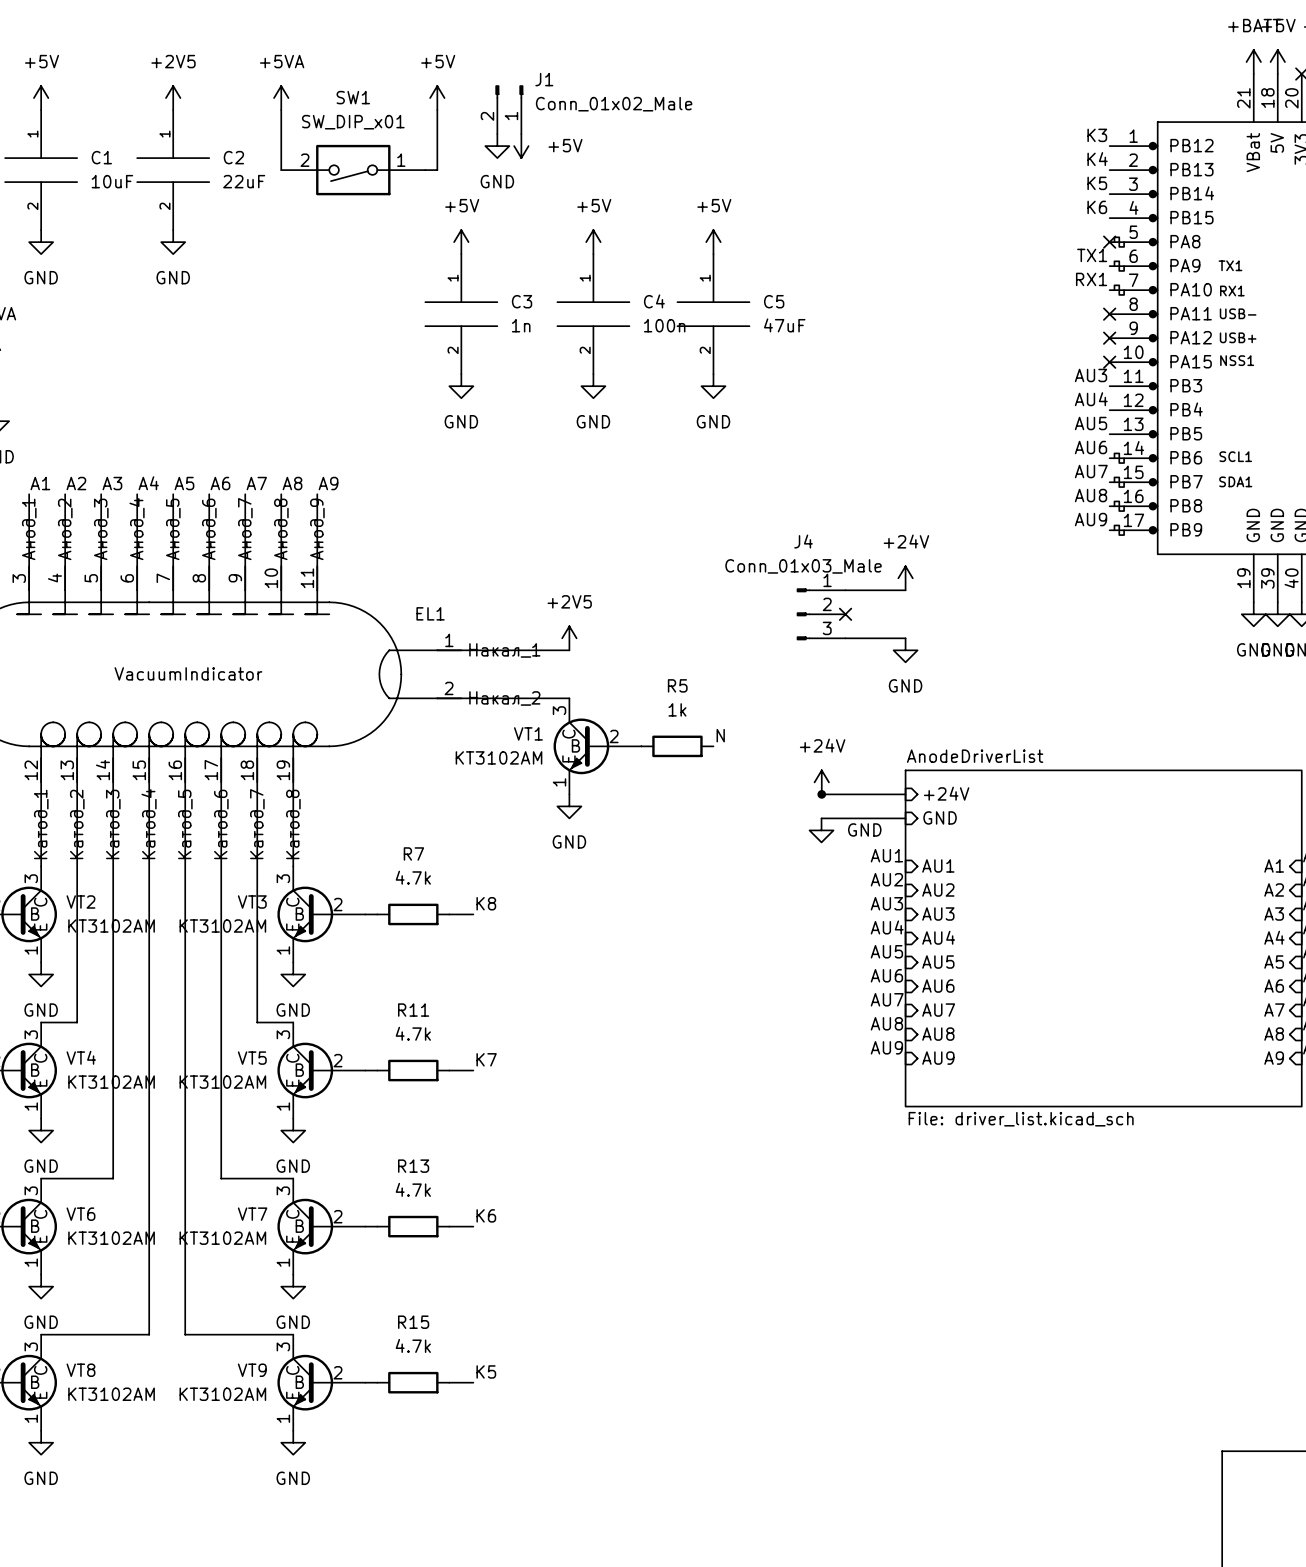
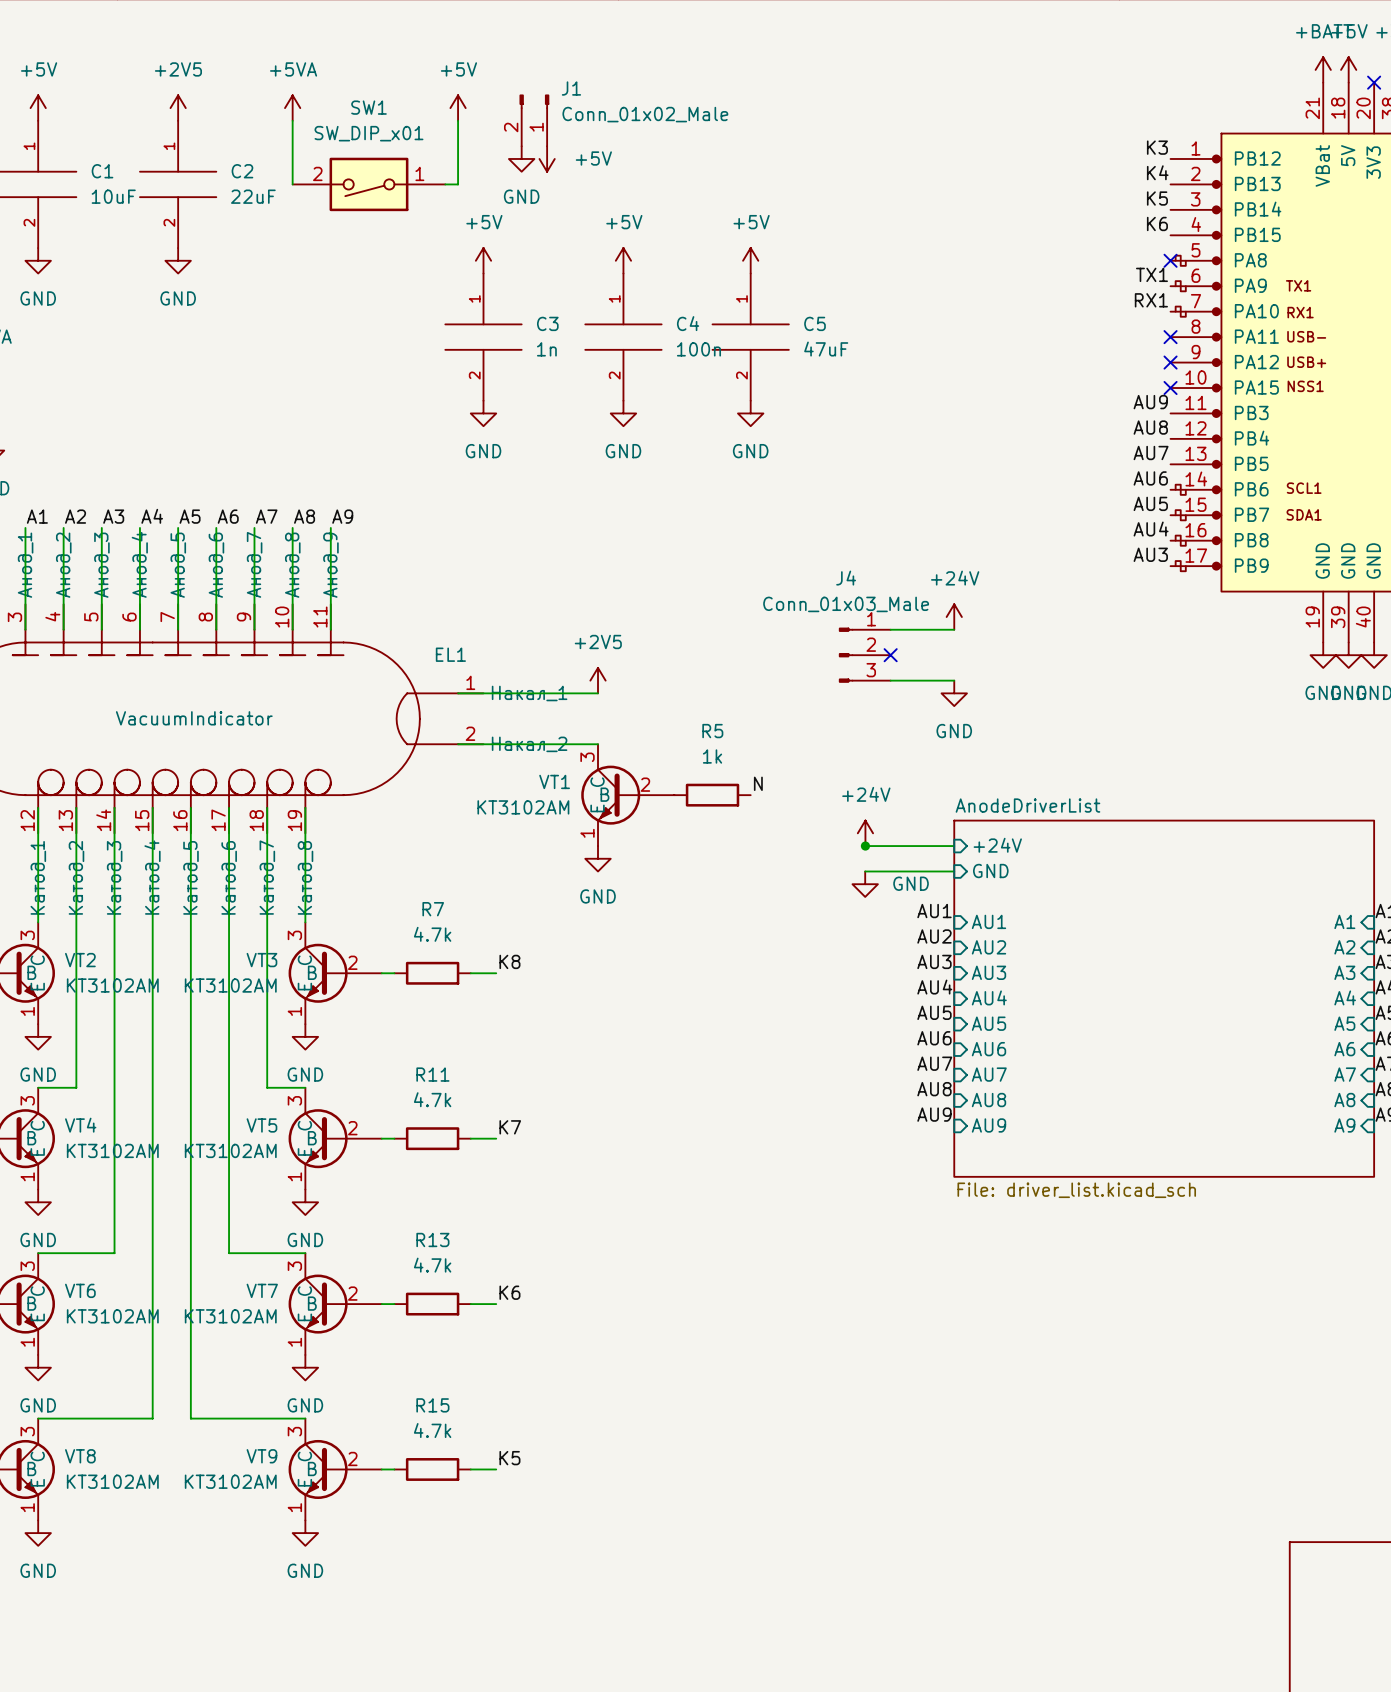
label: AU3 (1091, 375) -> AU9 (1150, 402)
label: AU4 (1091, 399) -> AU8 (1150, 427)
label: AU5 (1091, 423) -> AU7 (1151, 452)
label: AU7 (1091, 471) -> AU5 (1150, 503)
label: AU8 (1091, 495) -> AU4 (1151, 529)
label: AU9 (1091, 519) -> AU3 (1150, 554)

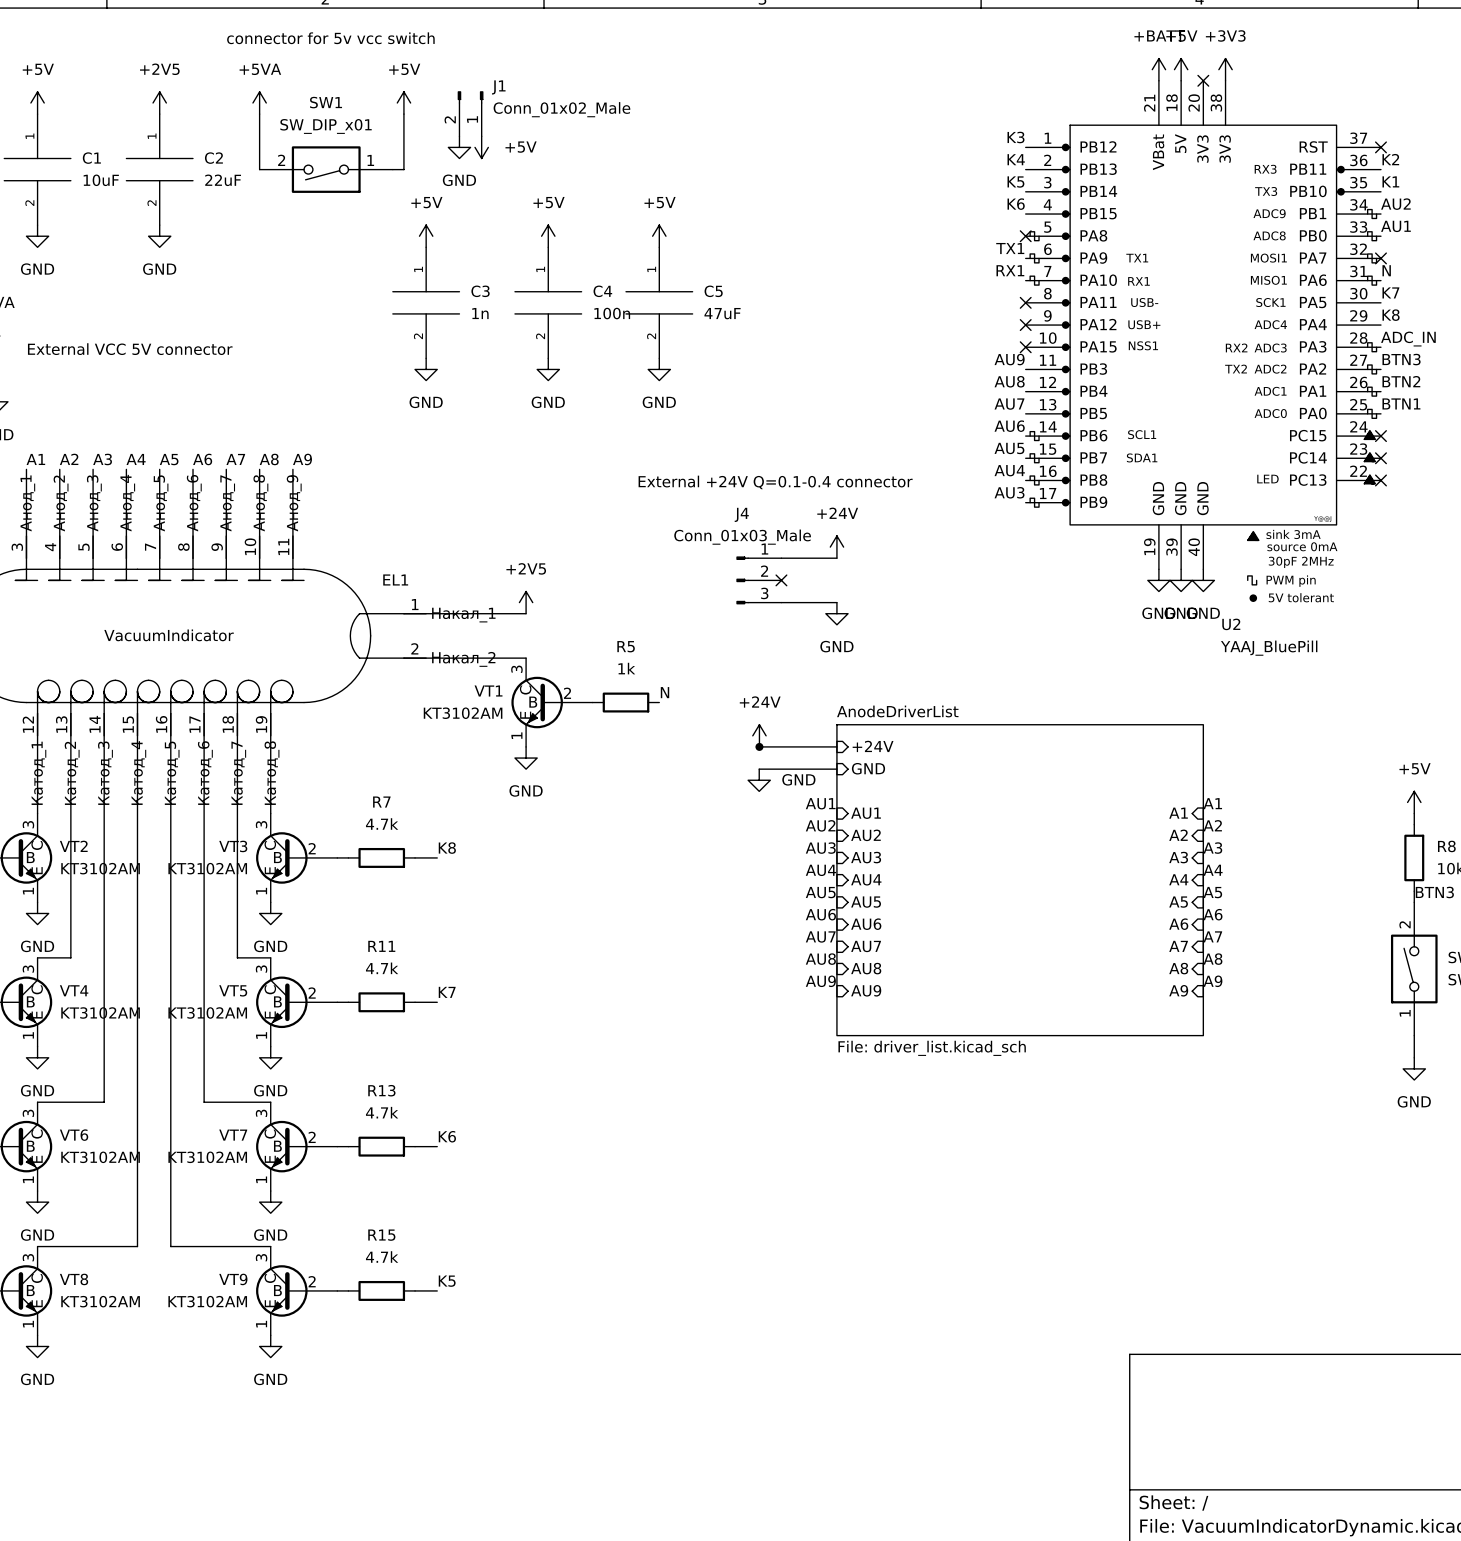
text: none -> connector for 5v vcc switch (330, 38)
text: none -> External VCC 5V connector (130, 349)
label: none -> External +24V Q=0.1-0.4 connector (775, 482)

